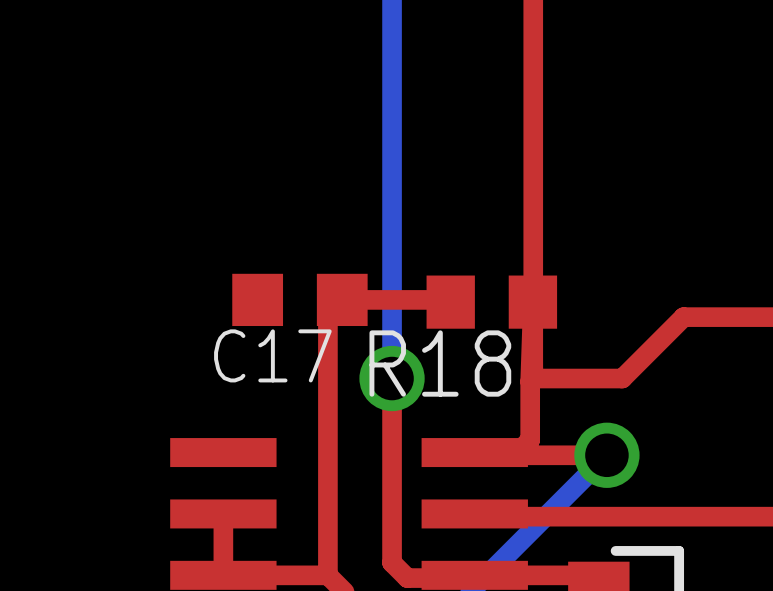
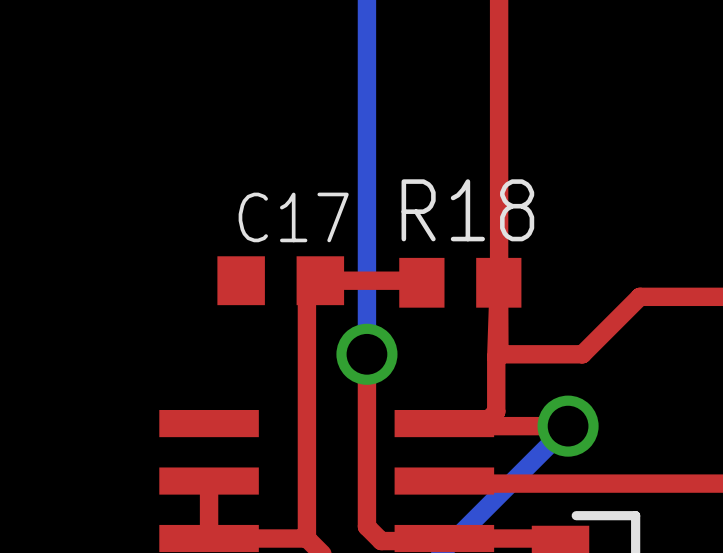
C17 name position: C17 (272, 355) -> C17 (293, 217)
R18 name position: R18 (440, 363) -> R18 (467, 210)

